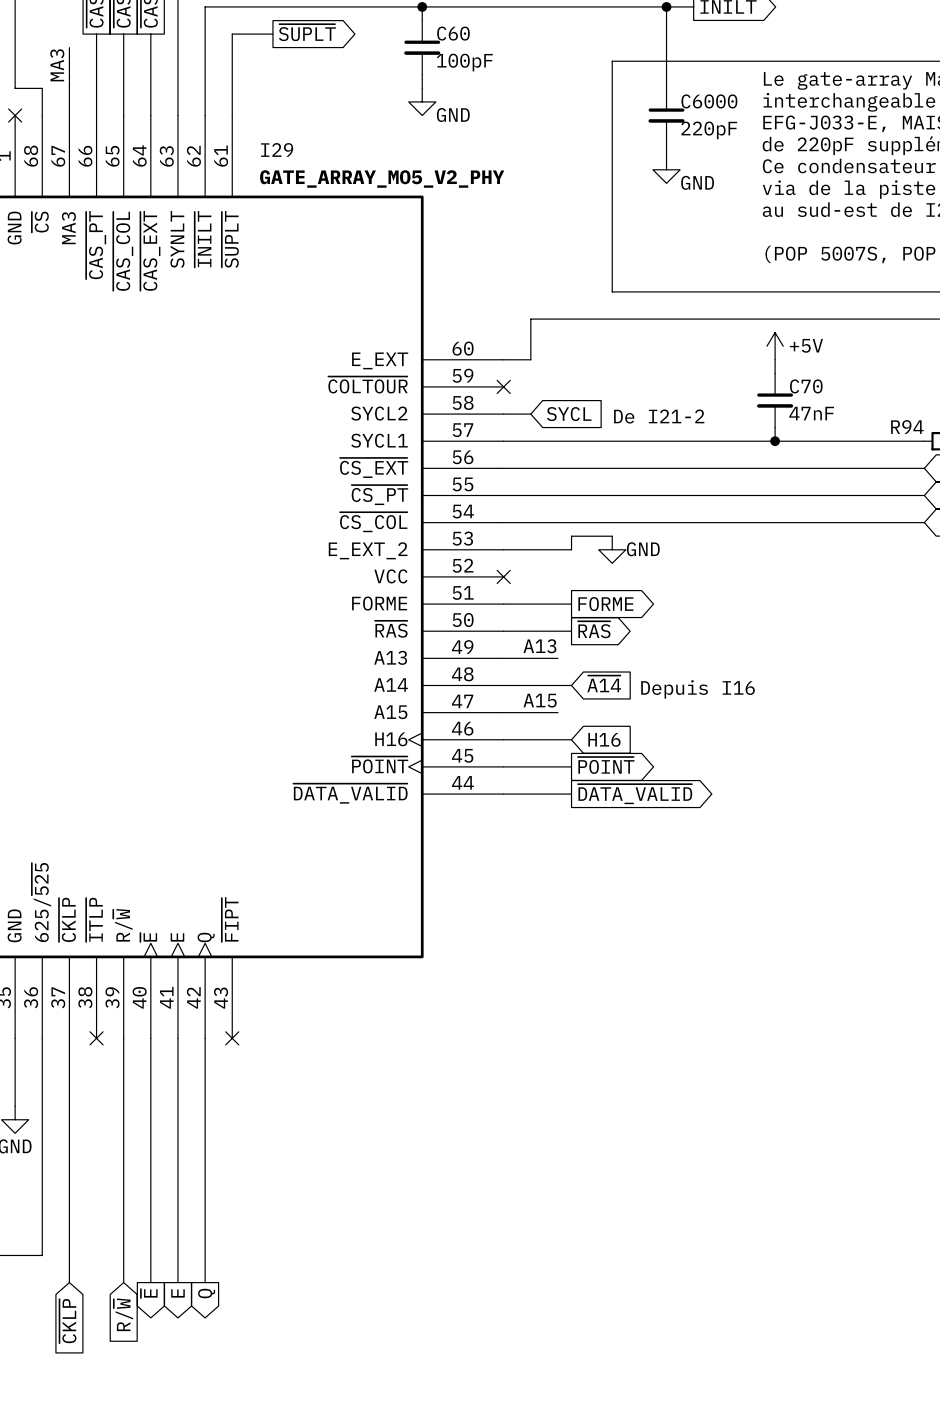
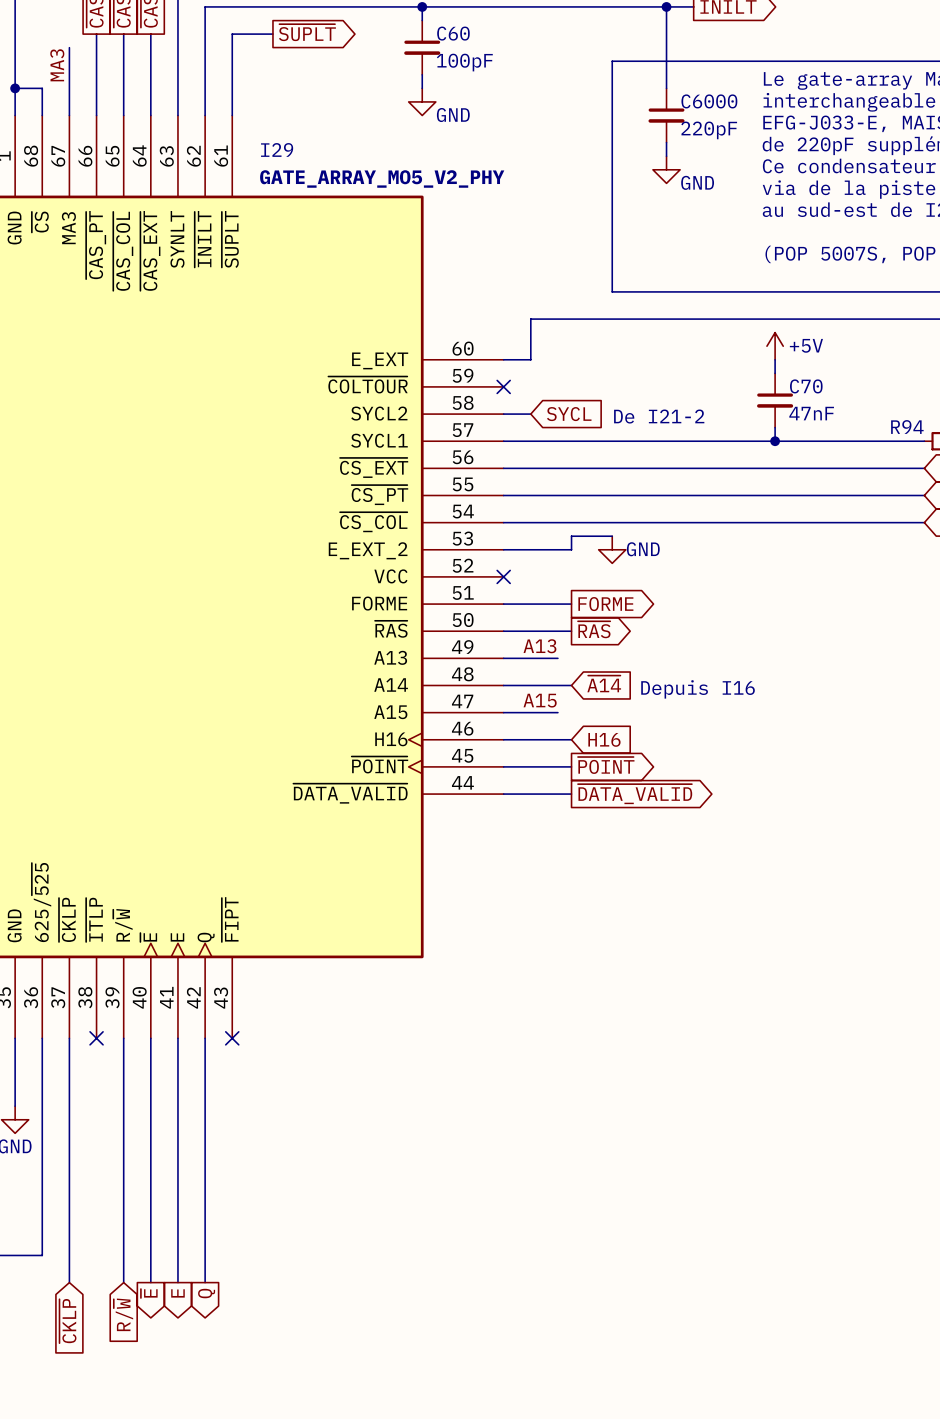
wire: none -> (15, 88) (15, 115)
junction: none -> (15, 88)
no-connect mark: (15, 115) -> none

